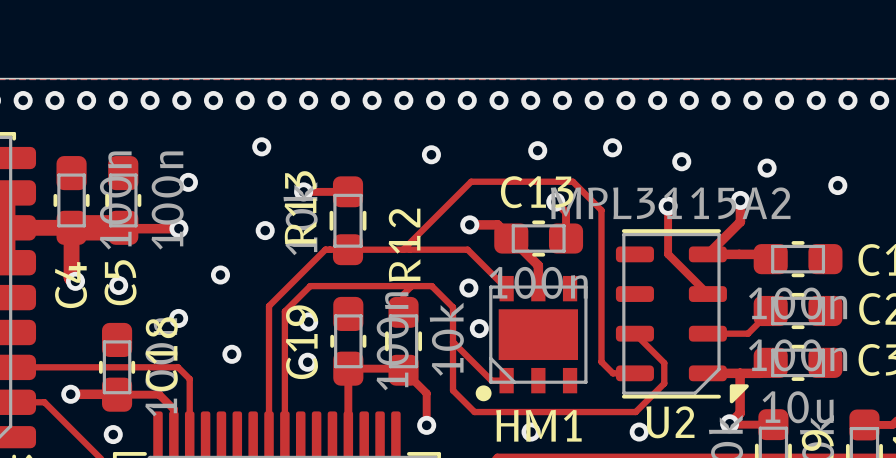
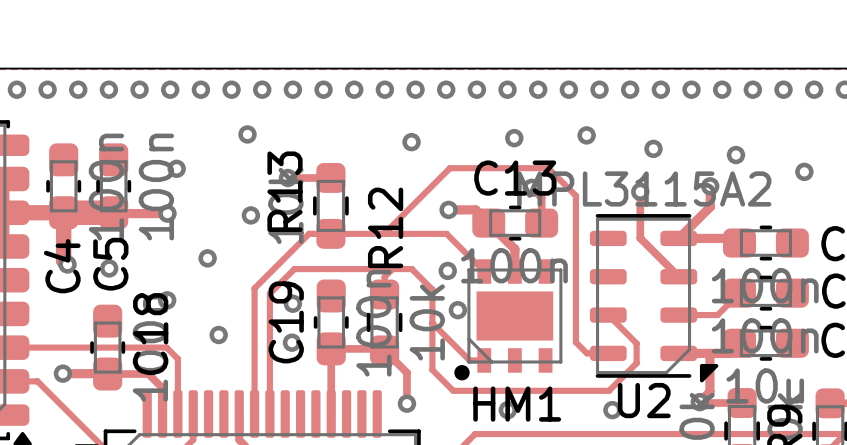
via: (113, 434) -> none

